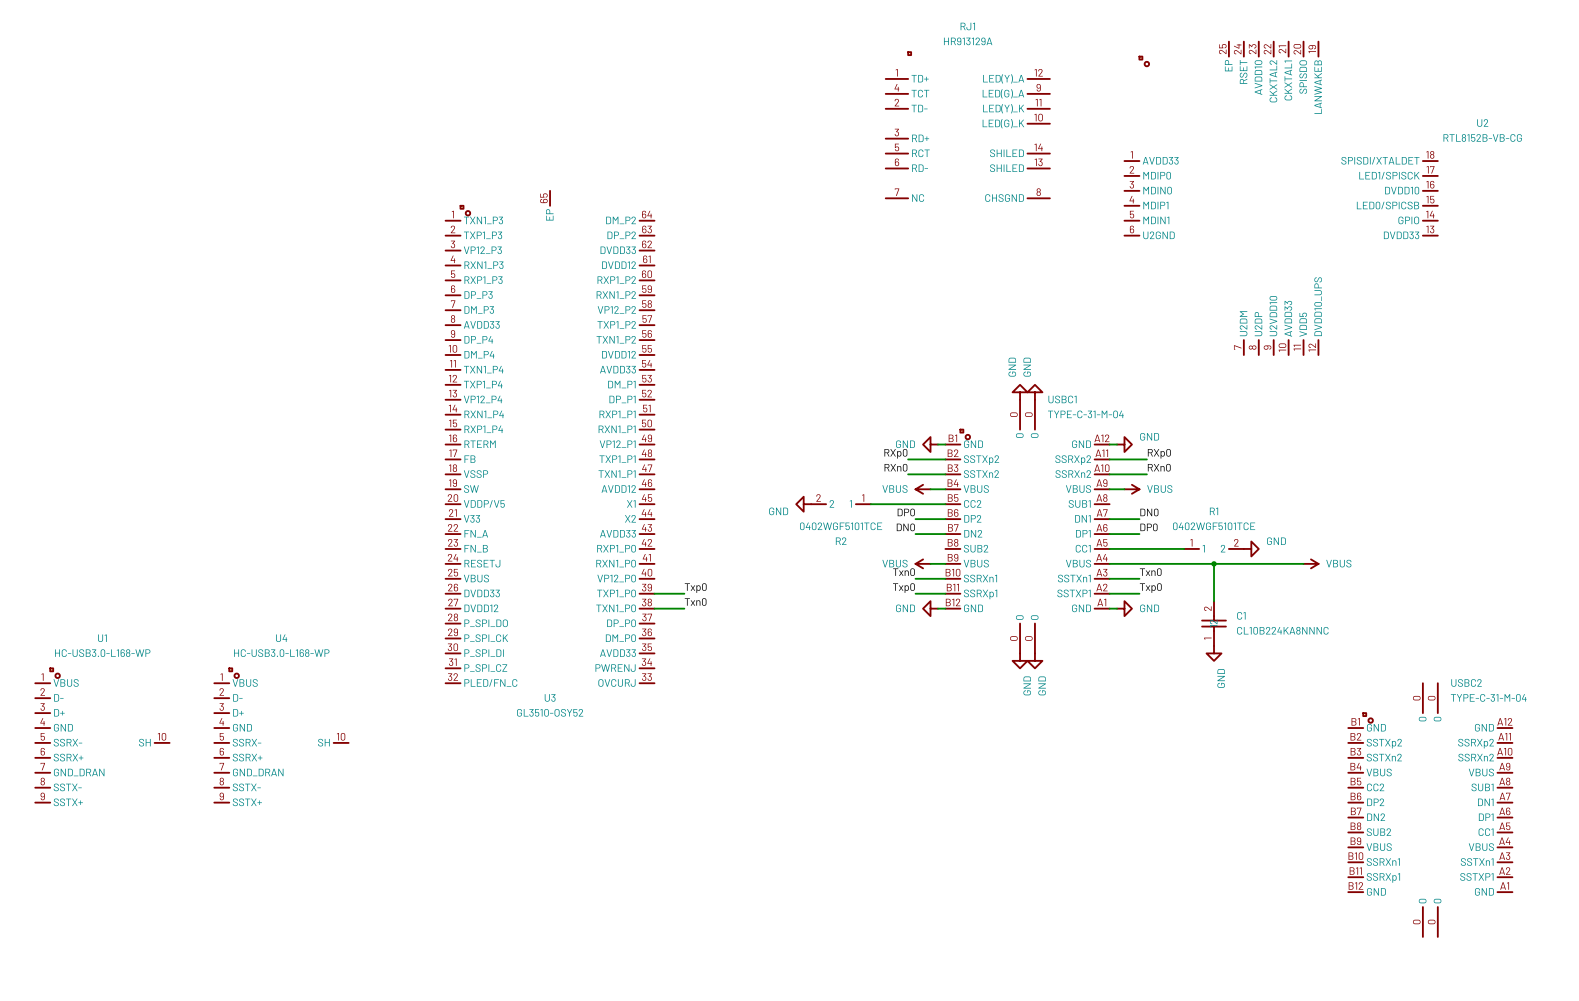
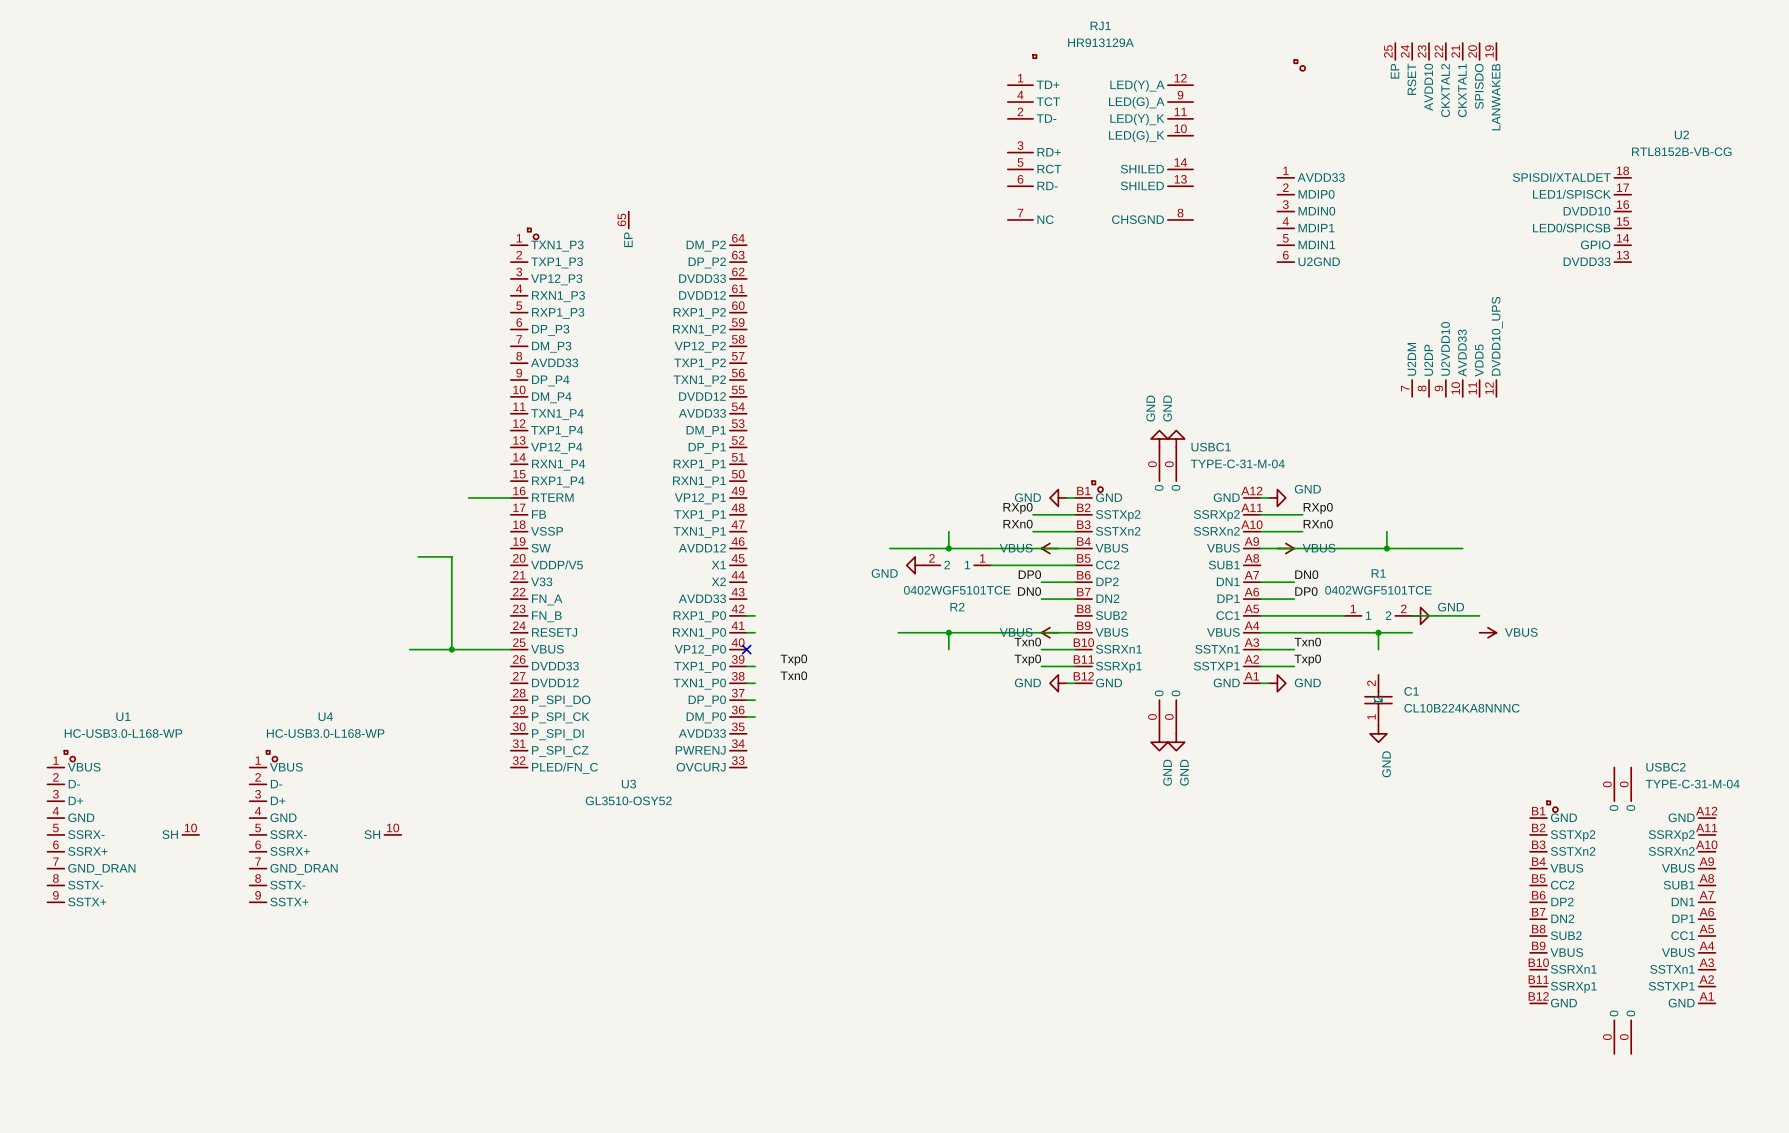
wire: none -> (468, 497) (510, 497)
wire: none -> (948, 531) (948, 548)
wire: none -> (1386, 531) (1386, 548)
wire: none -> (889, 548) (1058, 548)
junction: none -> (948, 548)
wire: none -> (1277, 548) (1462, 548)
junction: none -> (1386, 548)
wire: none -> (418, 556) (451, 556) (451, 649)
wire: none -> (746, 615) (755, 615)
wire: none -> (746, 632) (755, 632)
wire: none -> (898, 632) (1058, 632)
wire: none -> (948, 632) (948, 649)
junction: none -> (948, 632)
wire: (1243, 563) (1303, 563) -> (1412, 615) (1479, 615)
wire: none -> (409, 649) (510, 649)
junction: none -> (451, 649)
no-connect mark: none -> (746, 649)
wire: (1214, 578) (1214, 601) -> none
wire: (661, 593) (684, 593) -> none
wire: (661, 608) (684, 608) -> none
wire: none -> (746, 700) (755, 700)
wire: none -> (746, 716) (755, 716)

